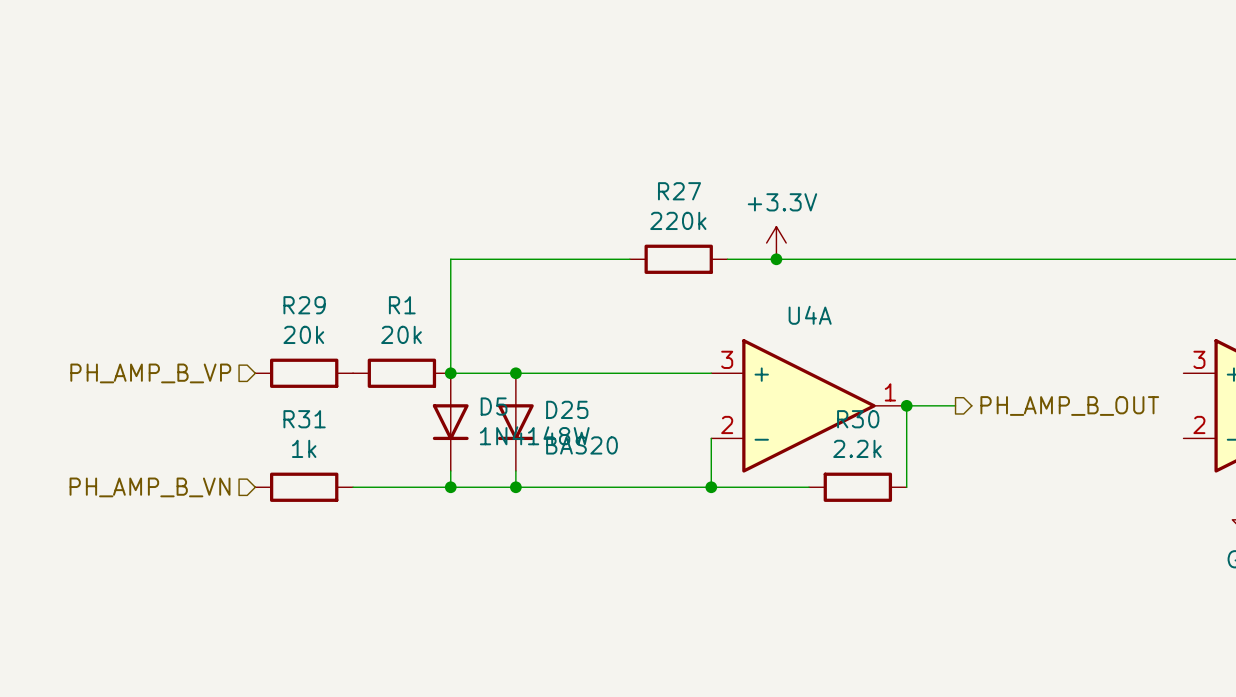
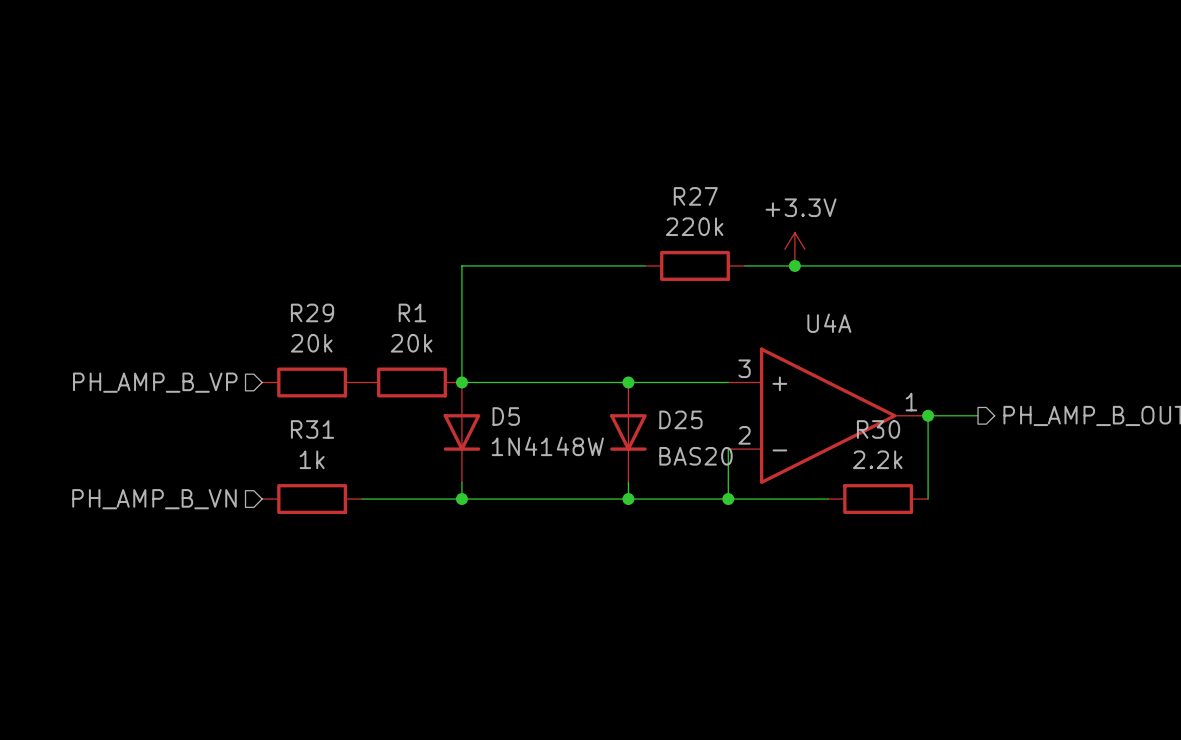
junction: (515, 373) -> none
junction: none -> (628, 382)
D25 position: (515, 422) -> (628, 432)
wire: (515, 470) (515, 487) -> (628, 482) (628, 499)
junction: (515, 487) -> none
junction: none -> (628, 499)

